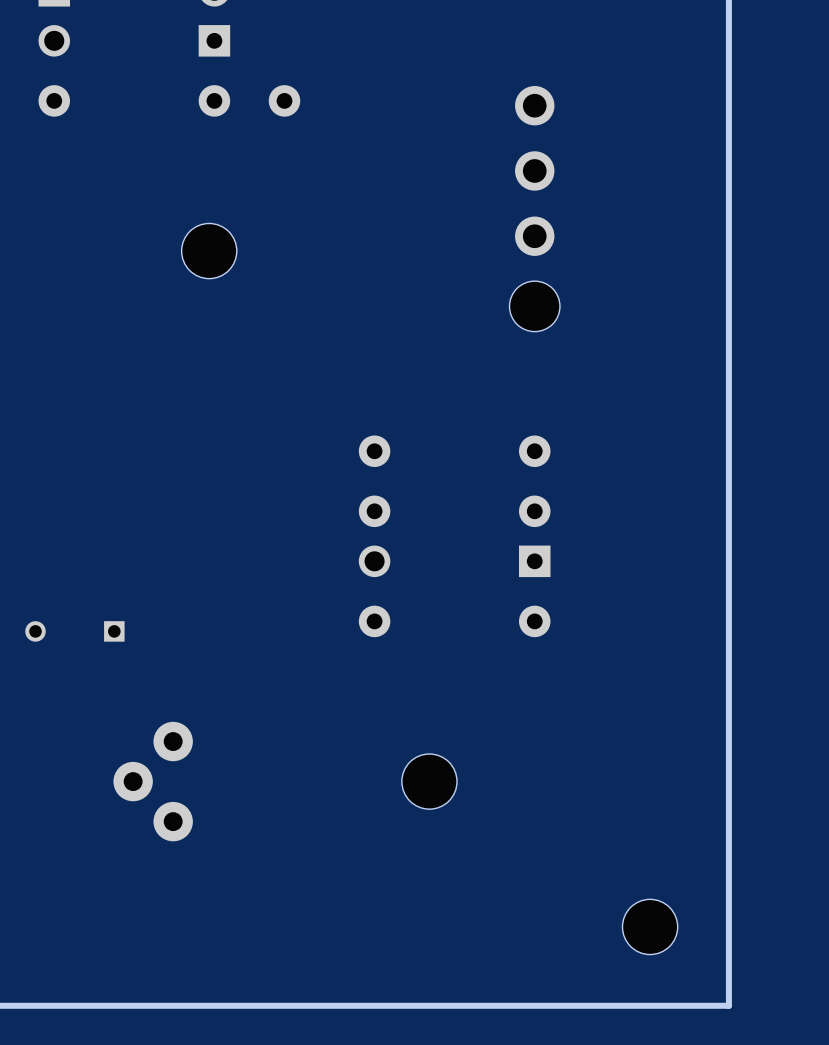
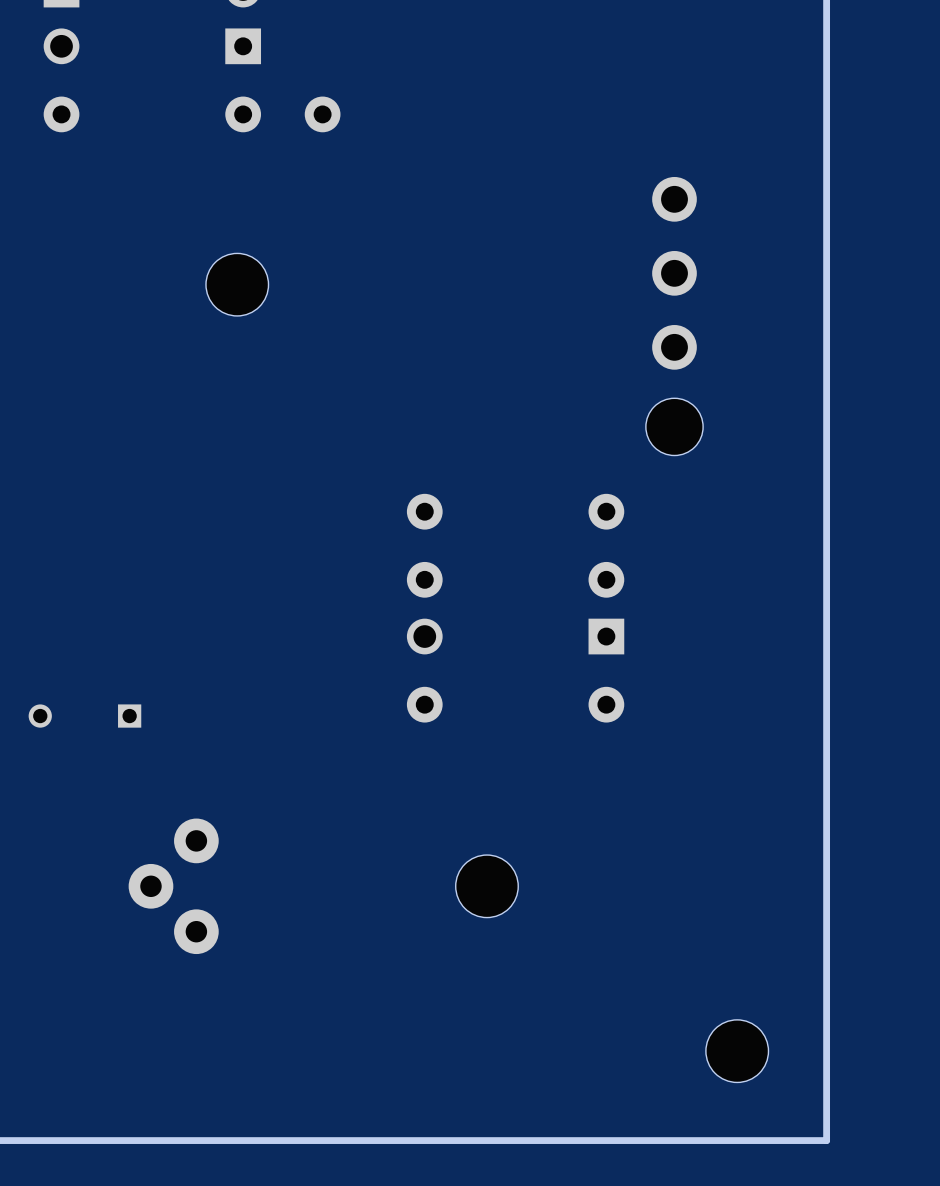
part position: (534, 208) -> (674, 316)

